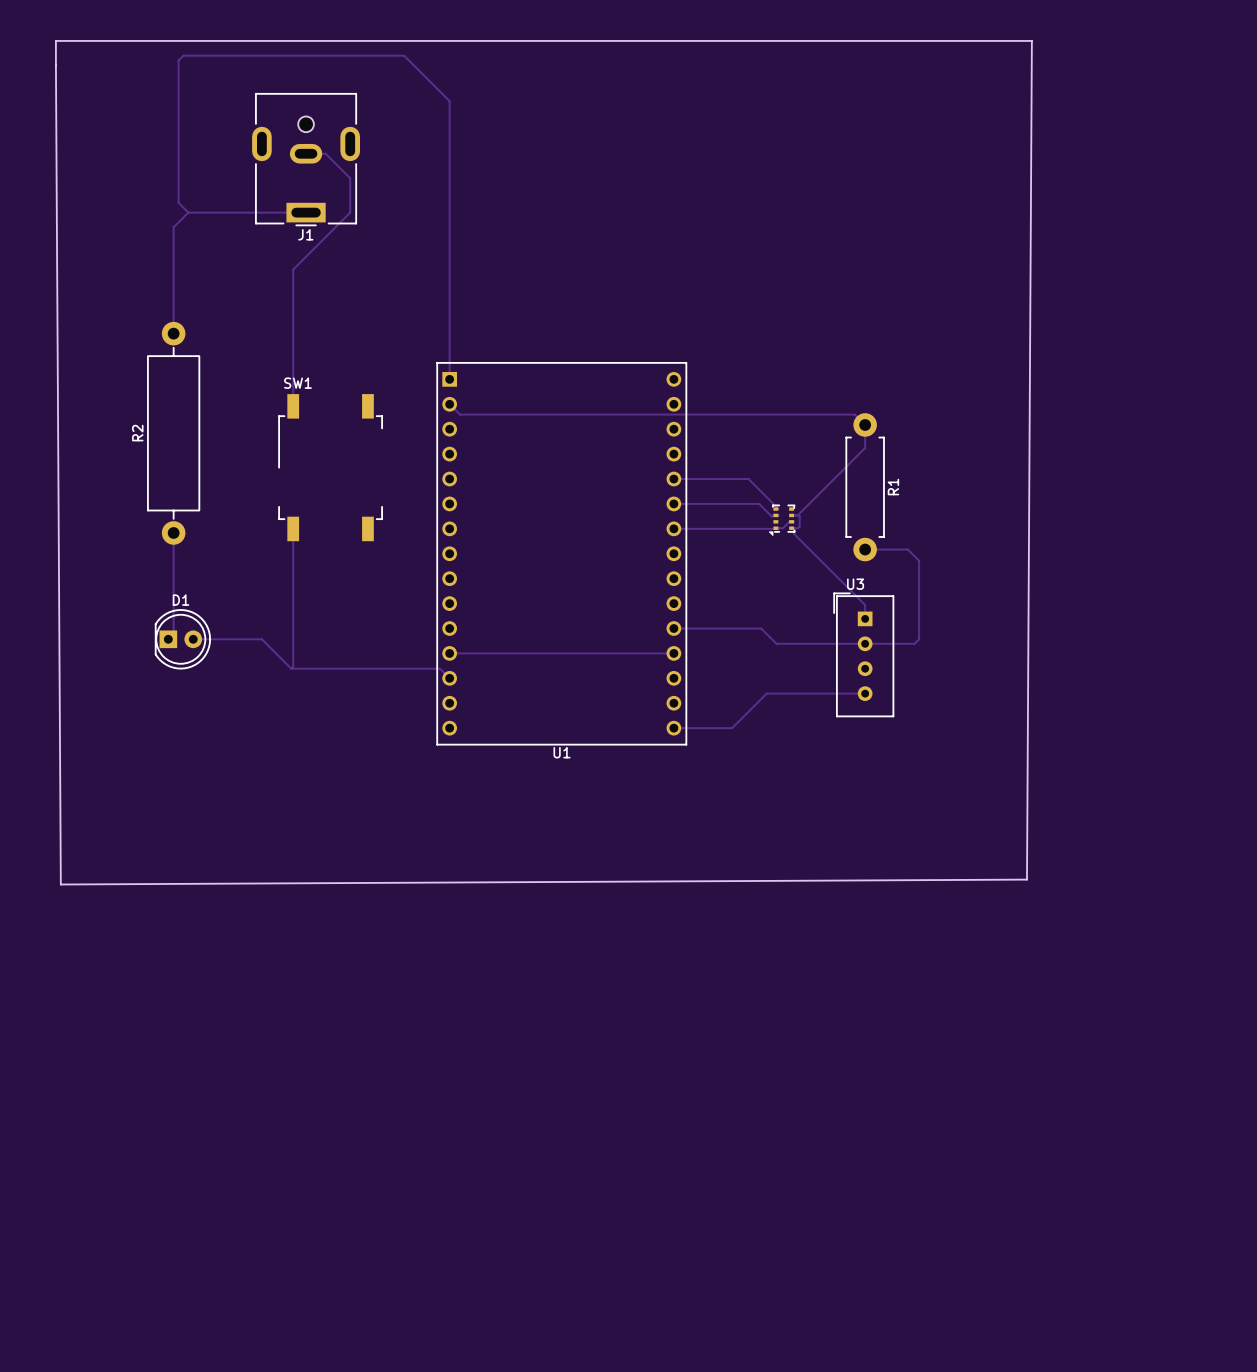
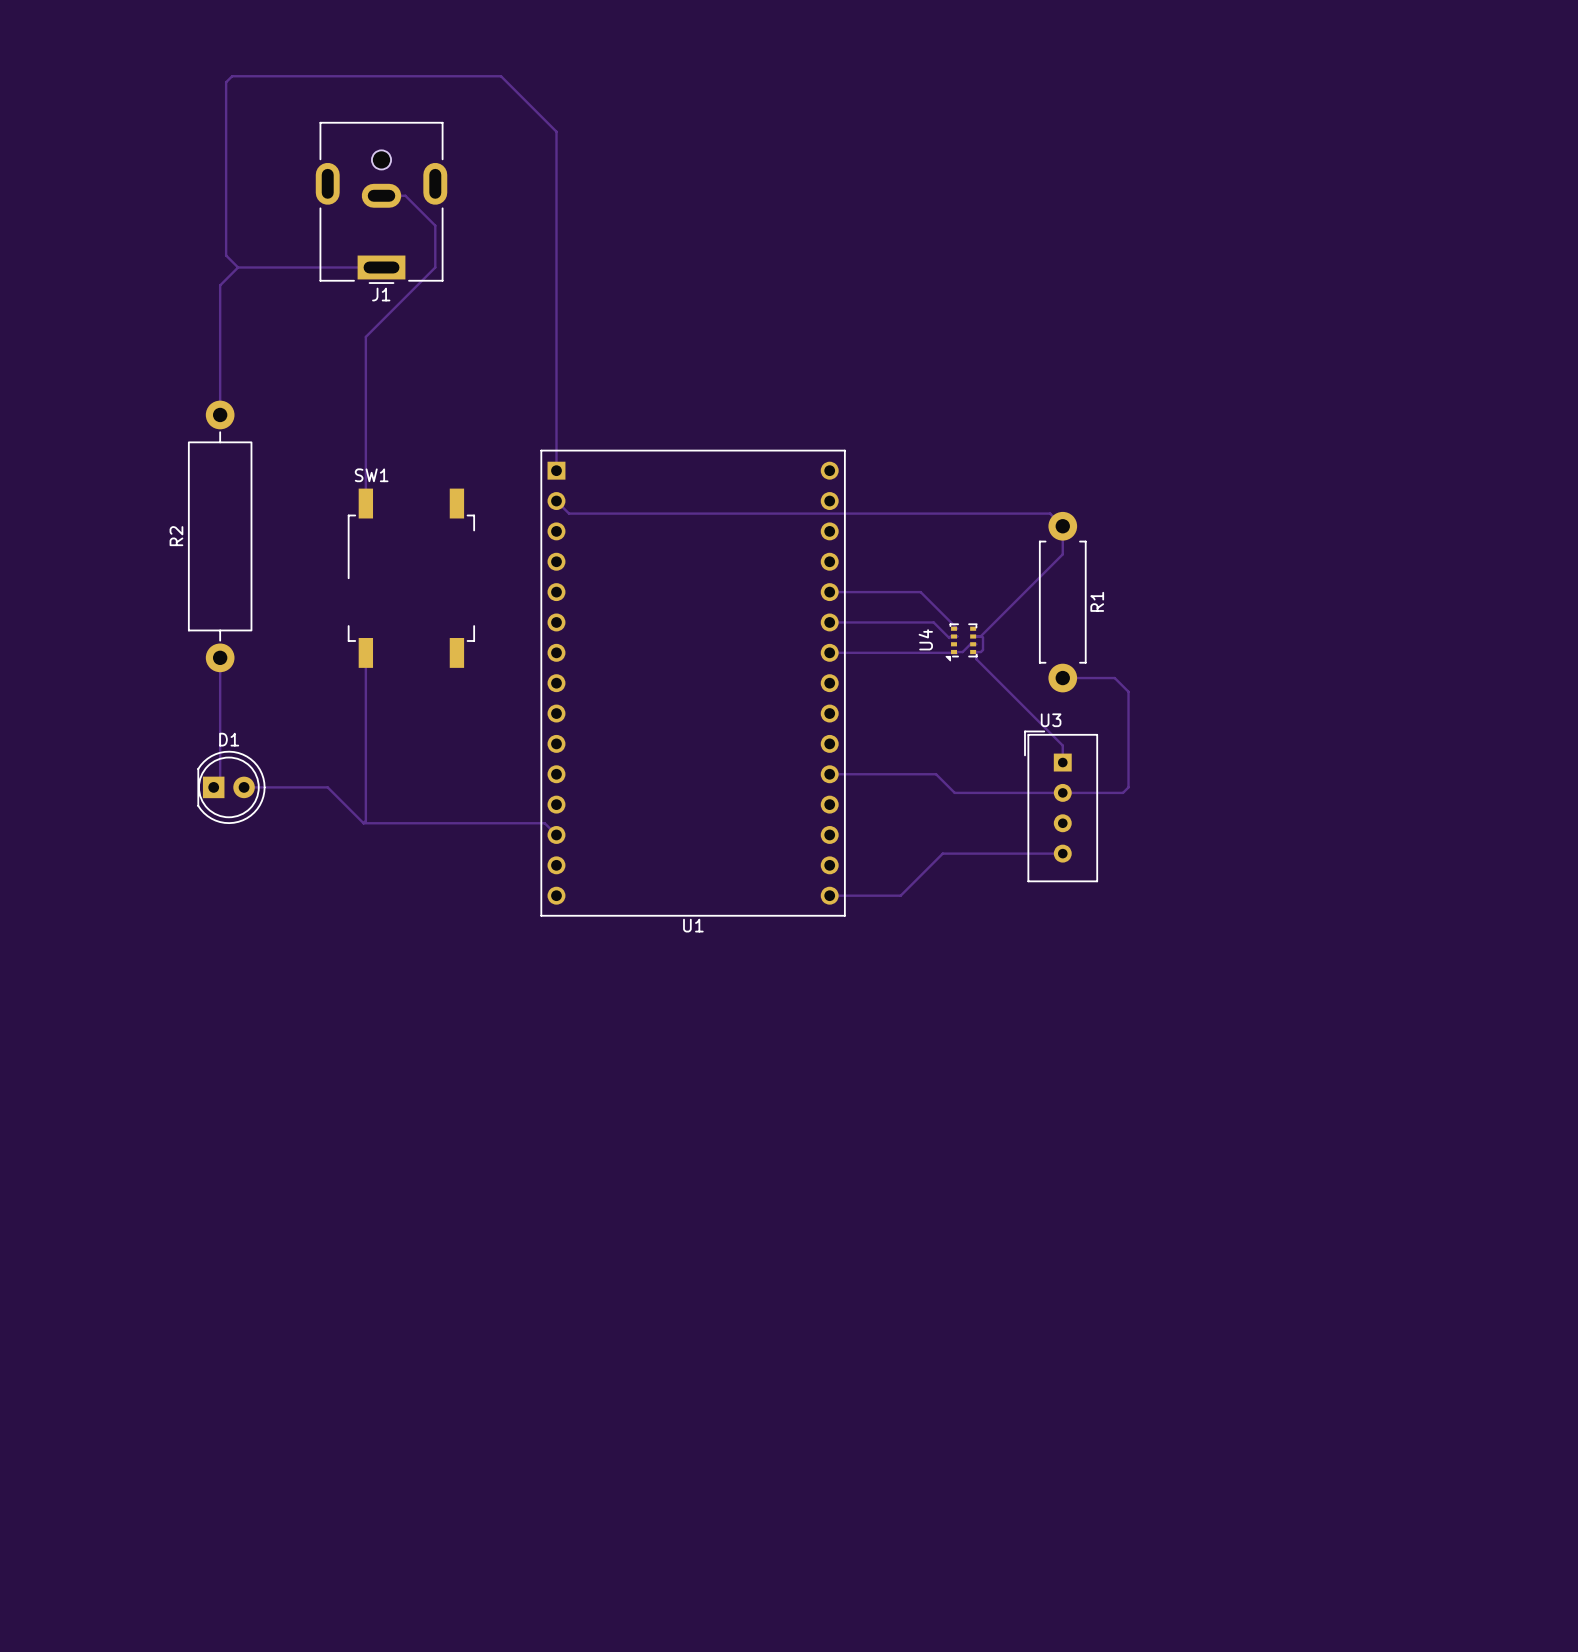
board edge: (55, 40) (1031, 40) (1026, 879) (60, 884) (55, 40) -> none
U4 name: none -> U4 (925, 639)
track: (449, 653) (673, 653) -> none

